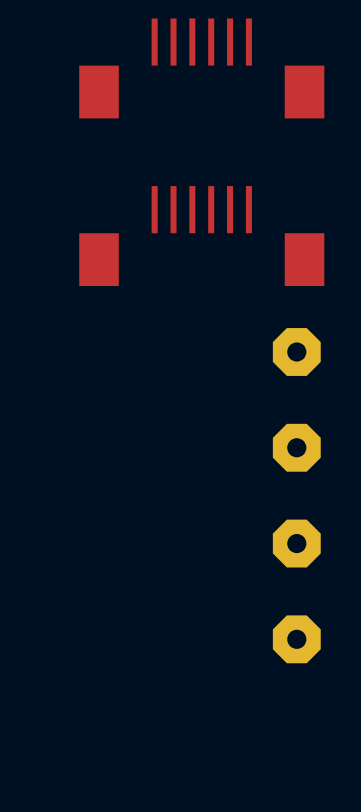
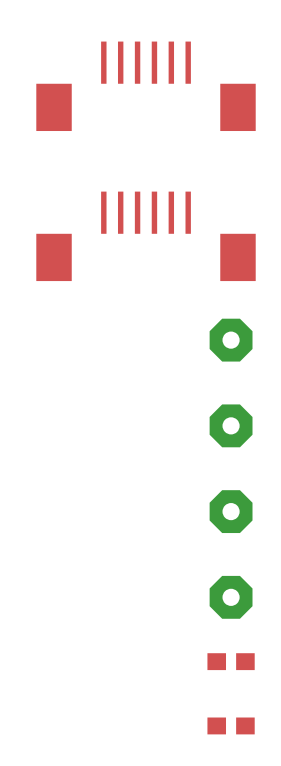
part: none -> (231, 661)
part: none -> (231, 725)

